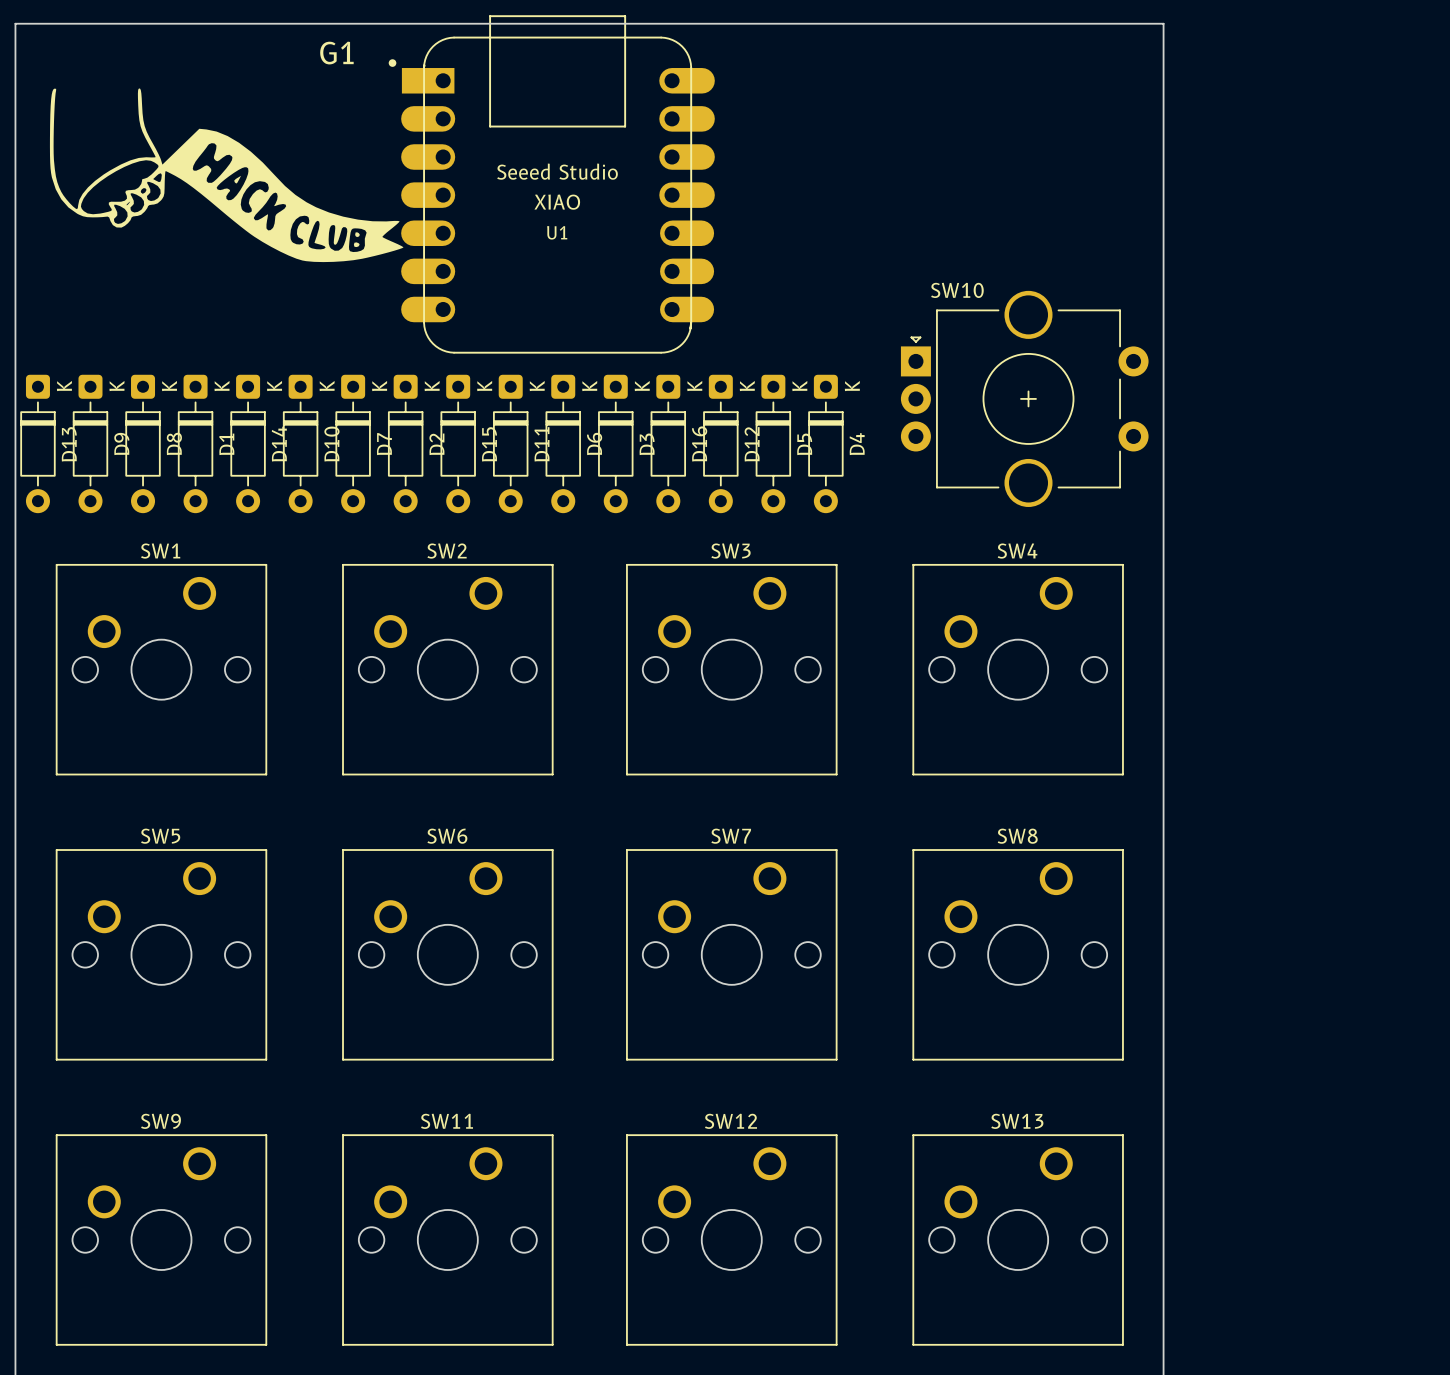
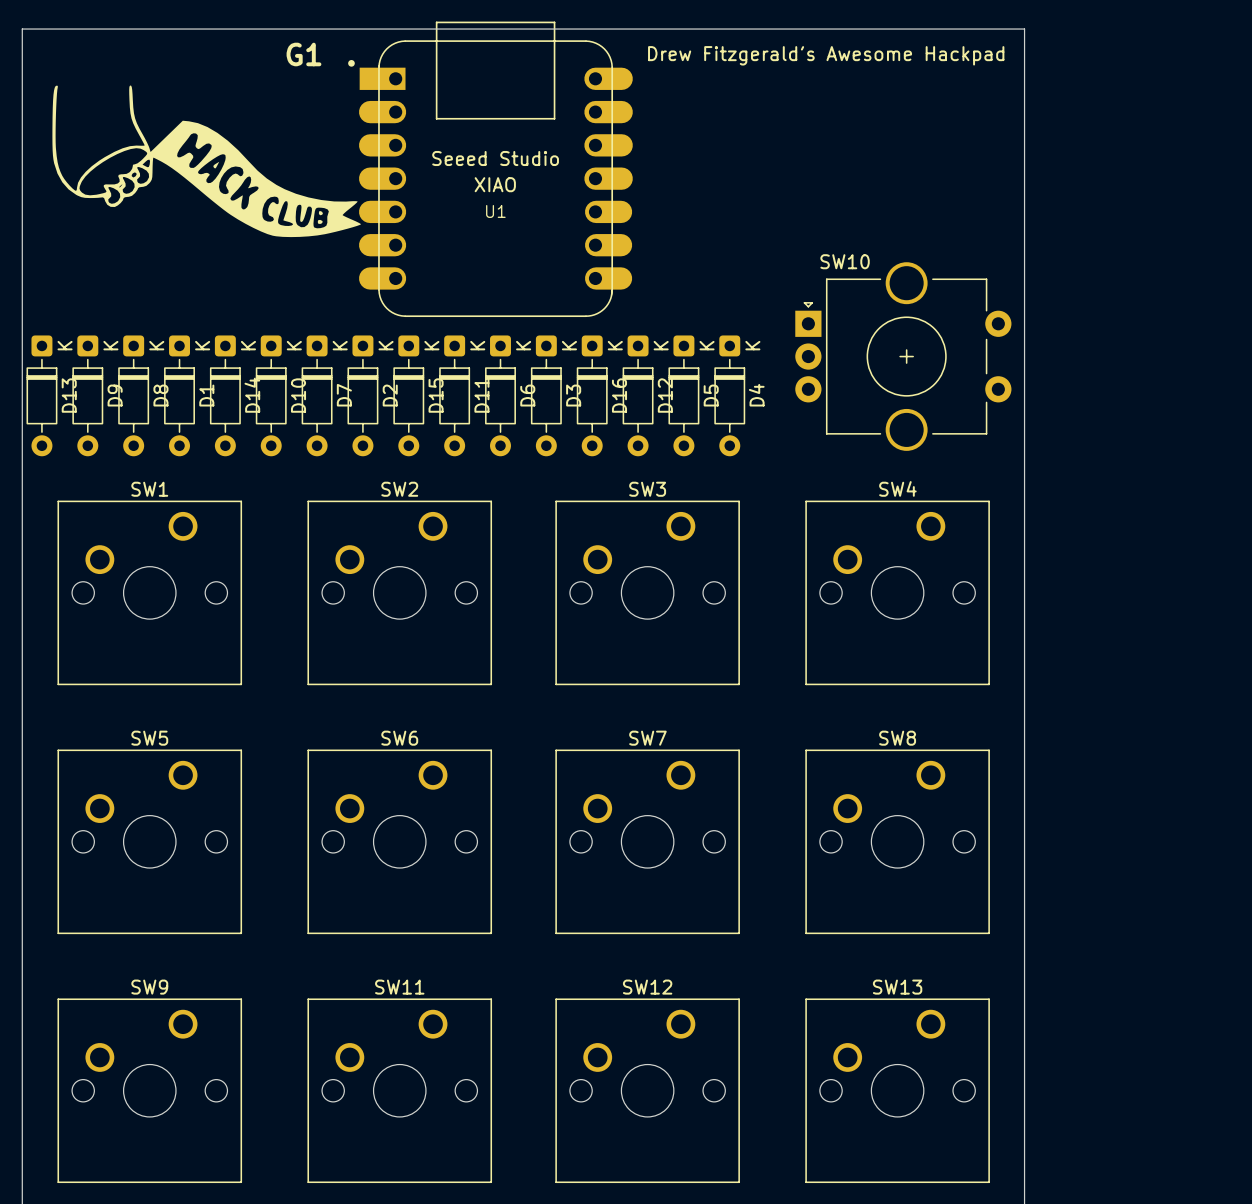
text: none -> Drew Fitzgerald's Awesome Hackpad (826, 55)

